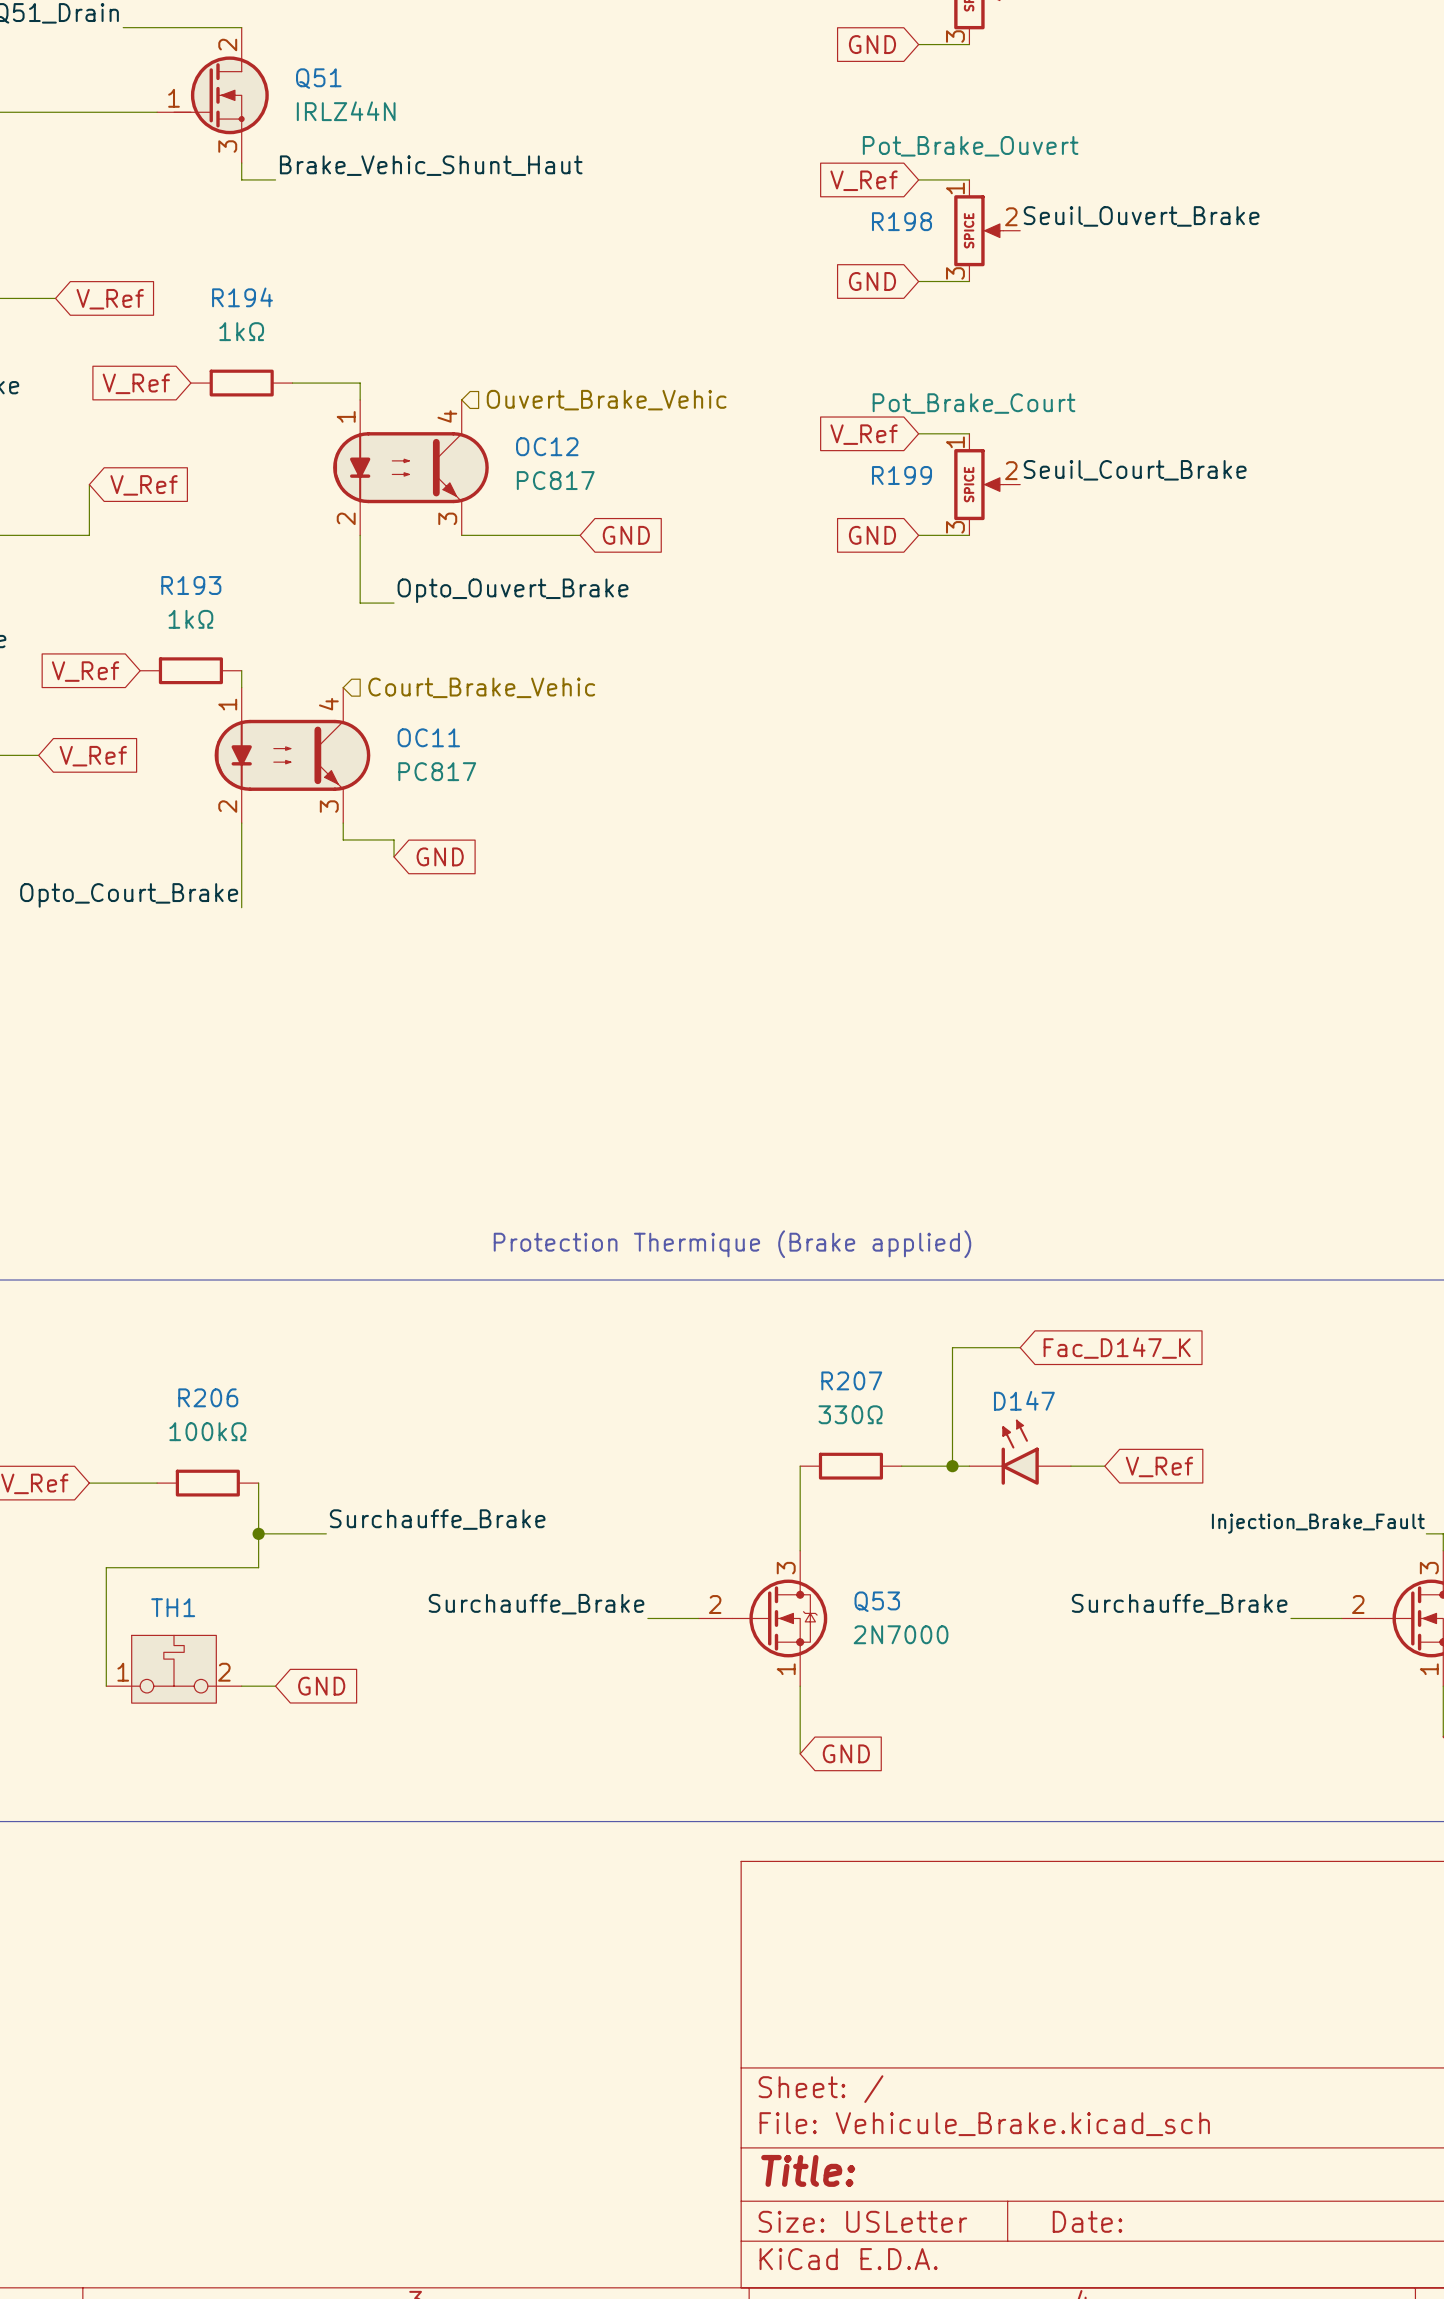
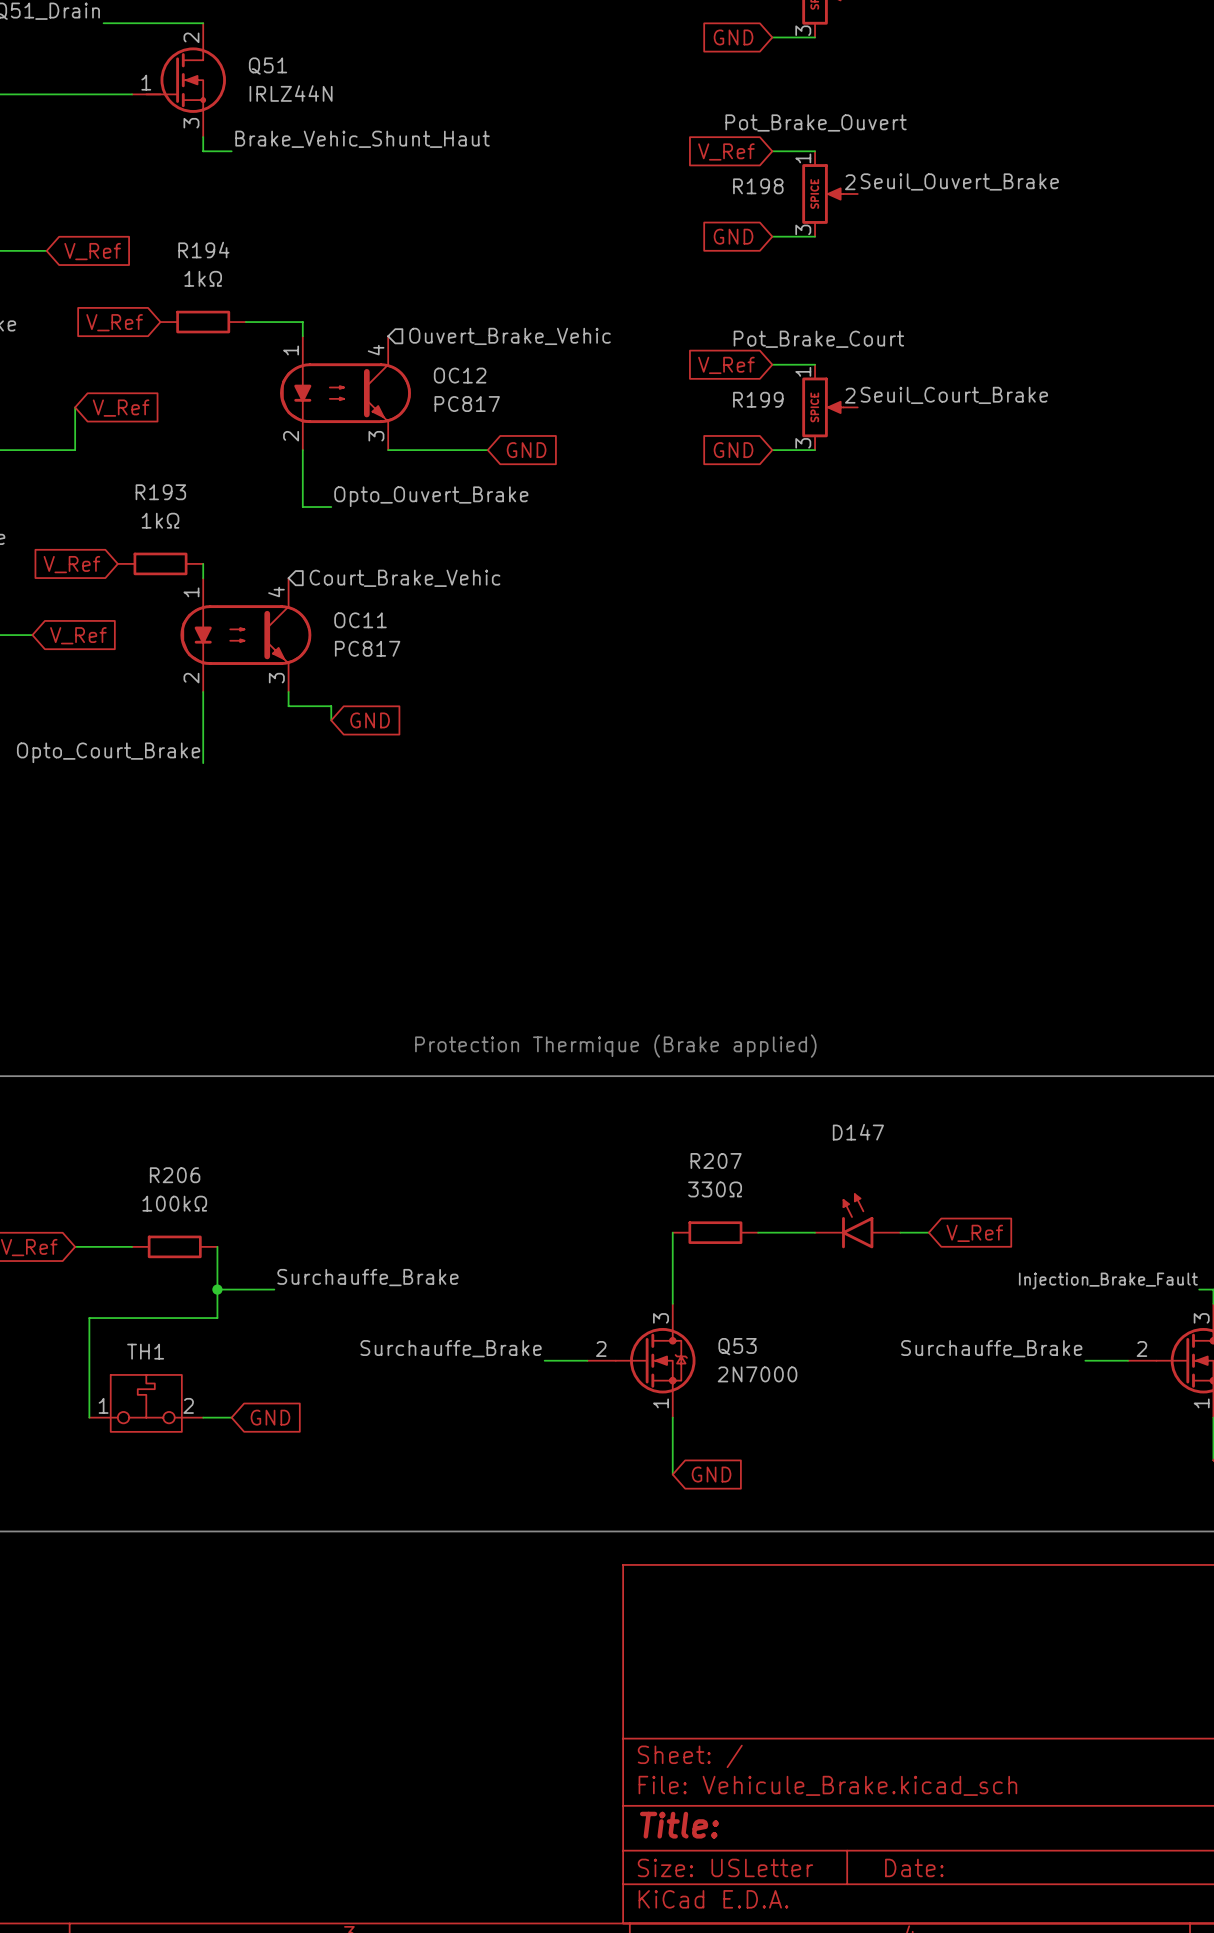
wire: (1020, 1347) (952, 1347) (952, 1466) -> none
global label: Fac_D147_K (1117, 1348) -> none
D147 name position: D147 (1024, 1400) -> D147 (858, 1132)
junction: (952, 1466) -> none

